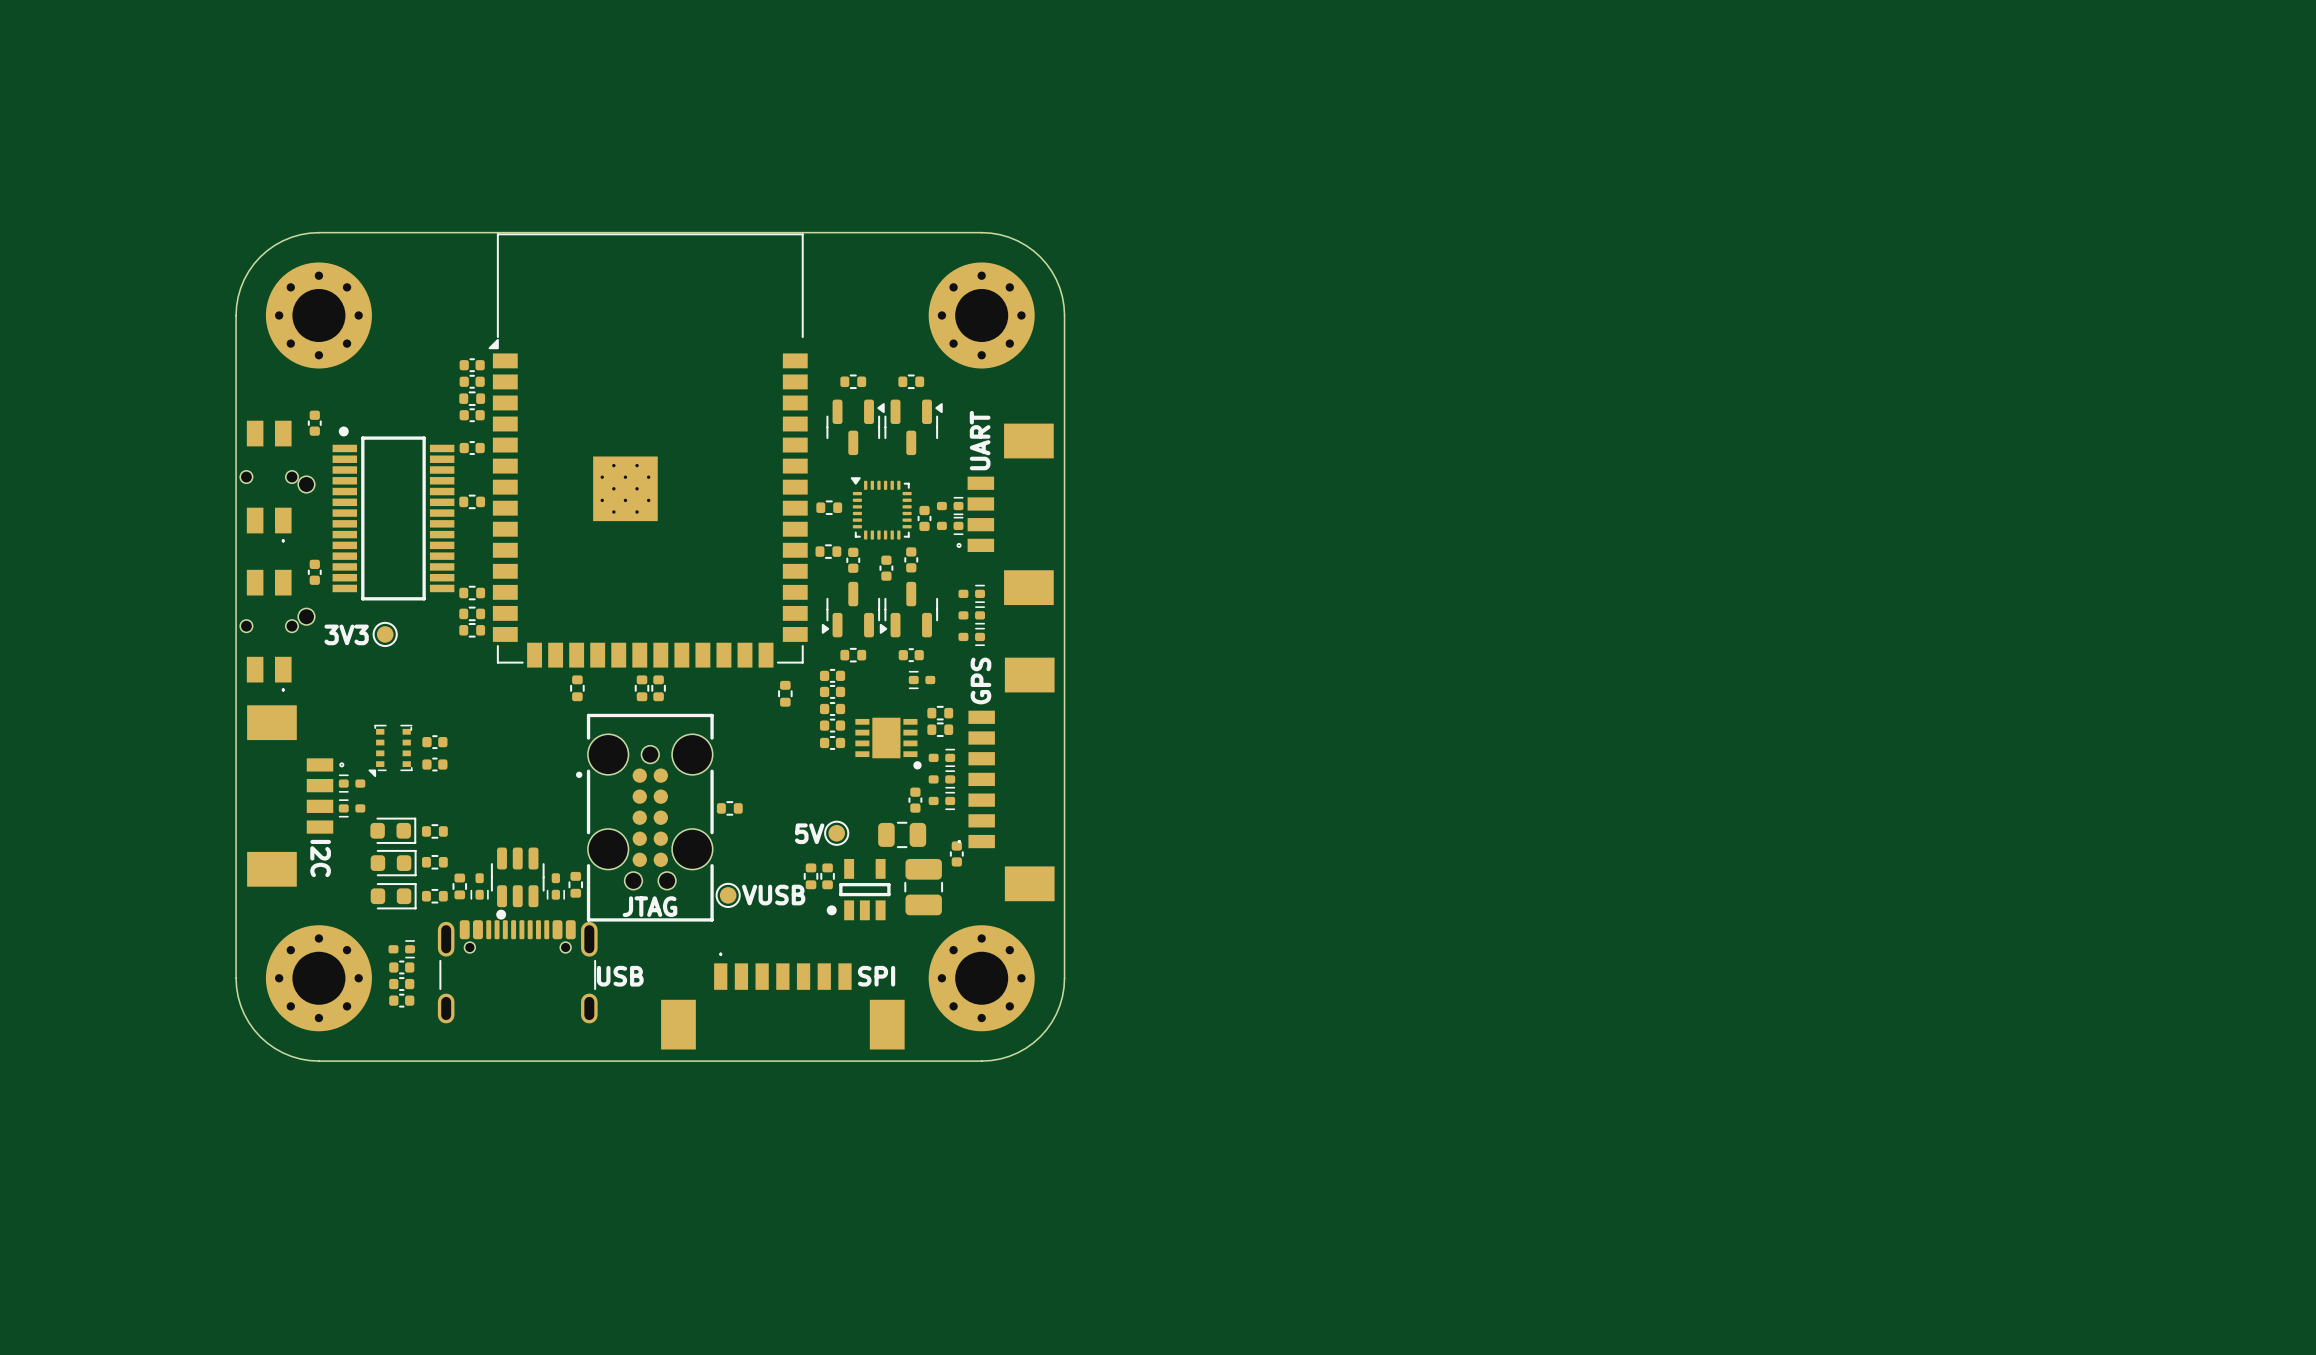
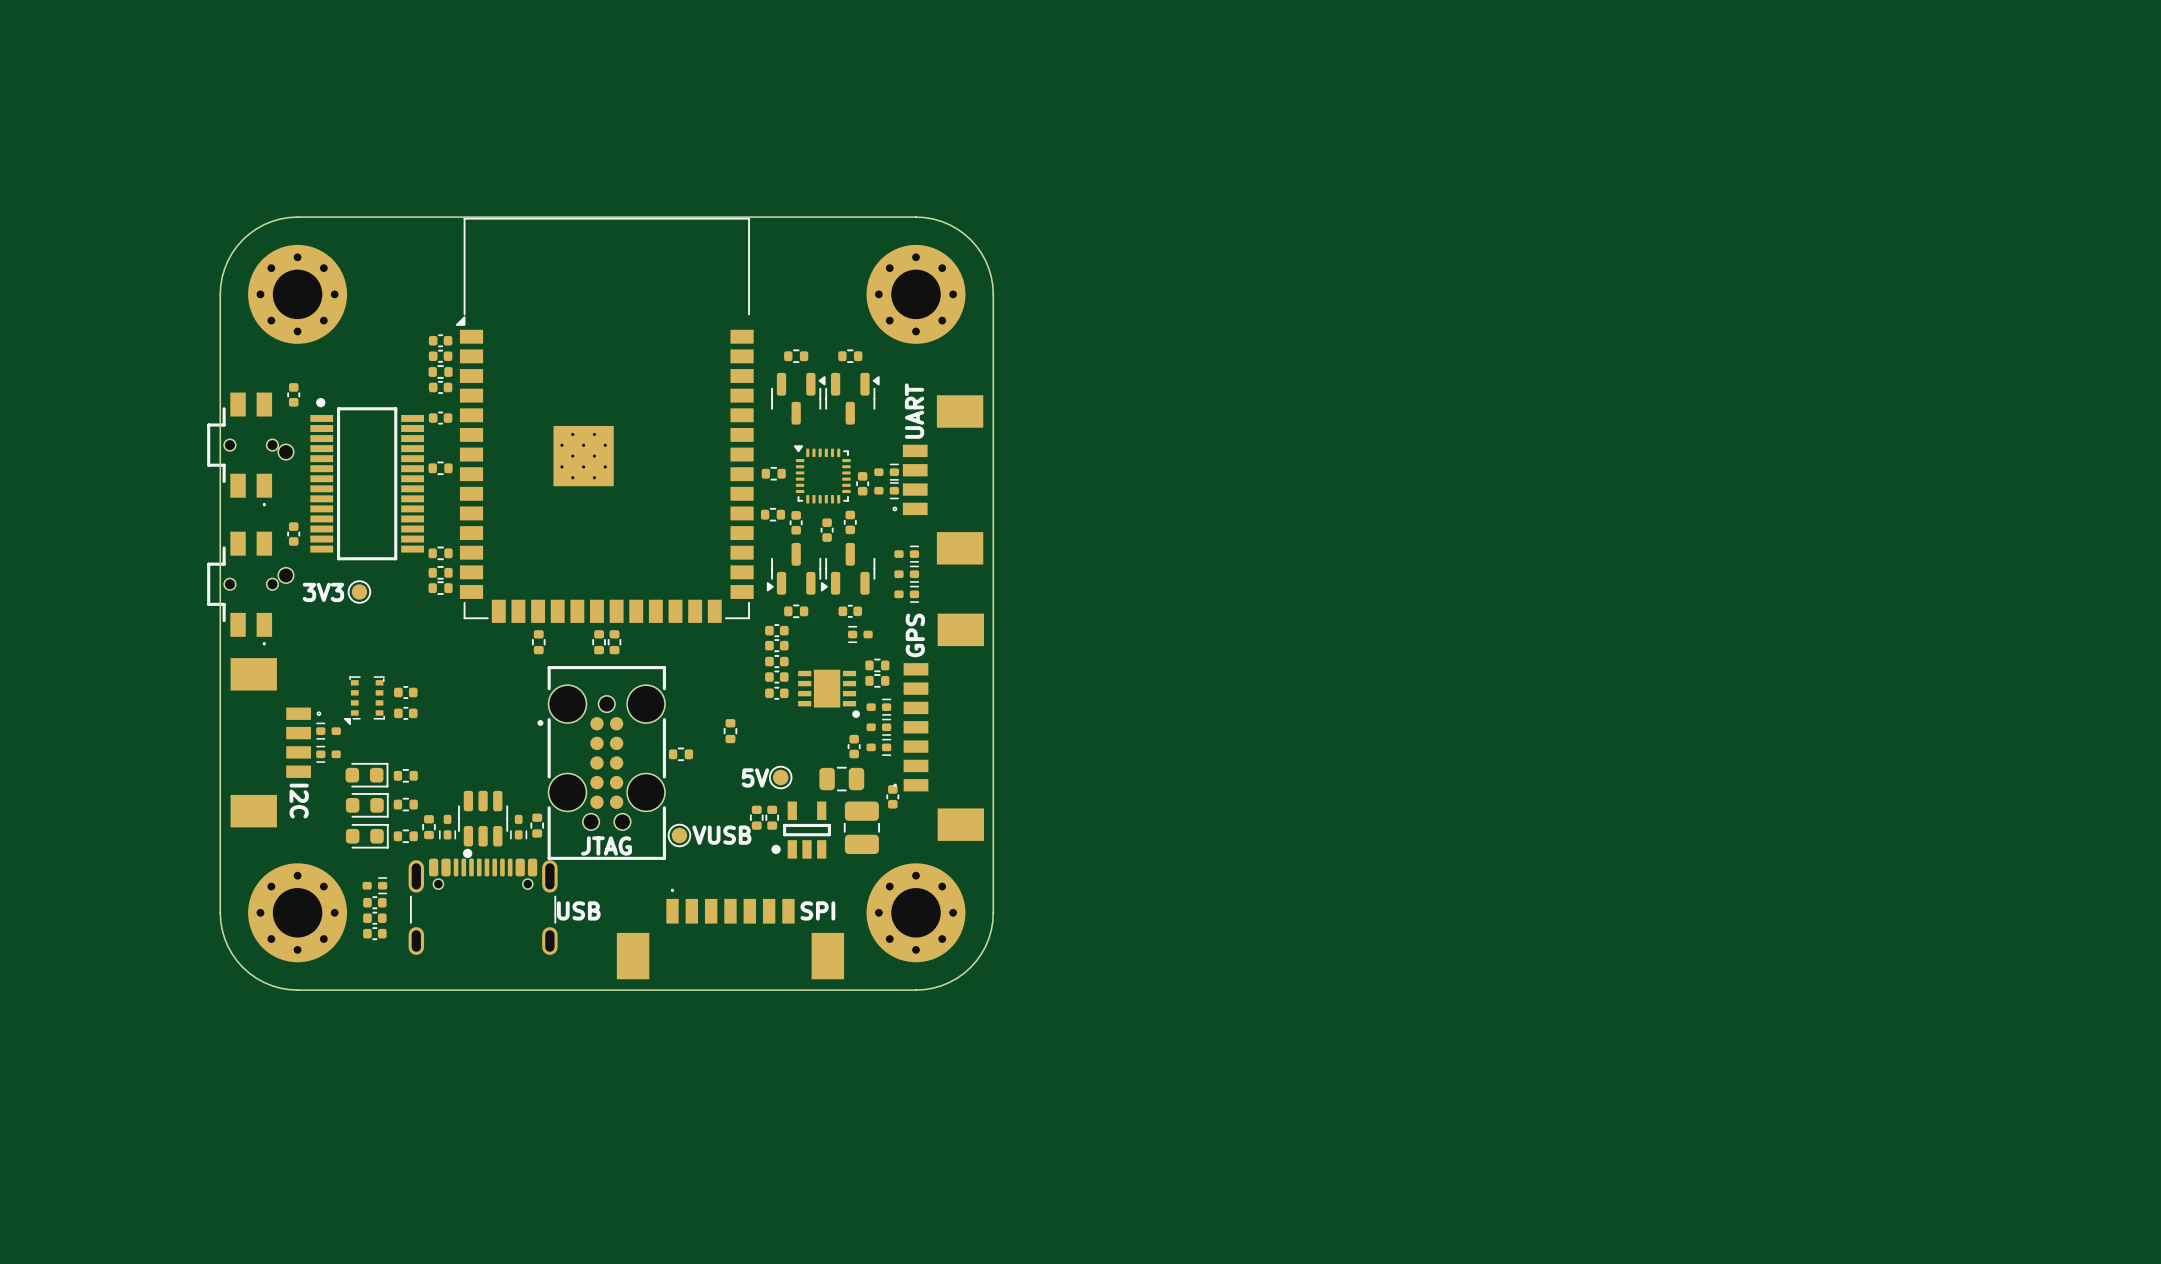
part footprint: [240, 420, 299, 543] -> [207, 392, 279, 507]
part footprint: [240, 569, 299, 692] -> [207, 531, 279, 646]
part position: (785, 693) -> (730, 731)

